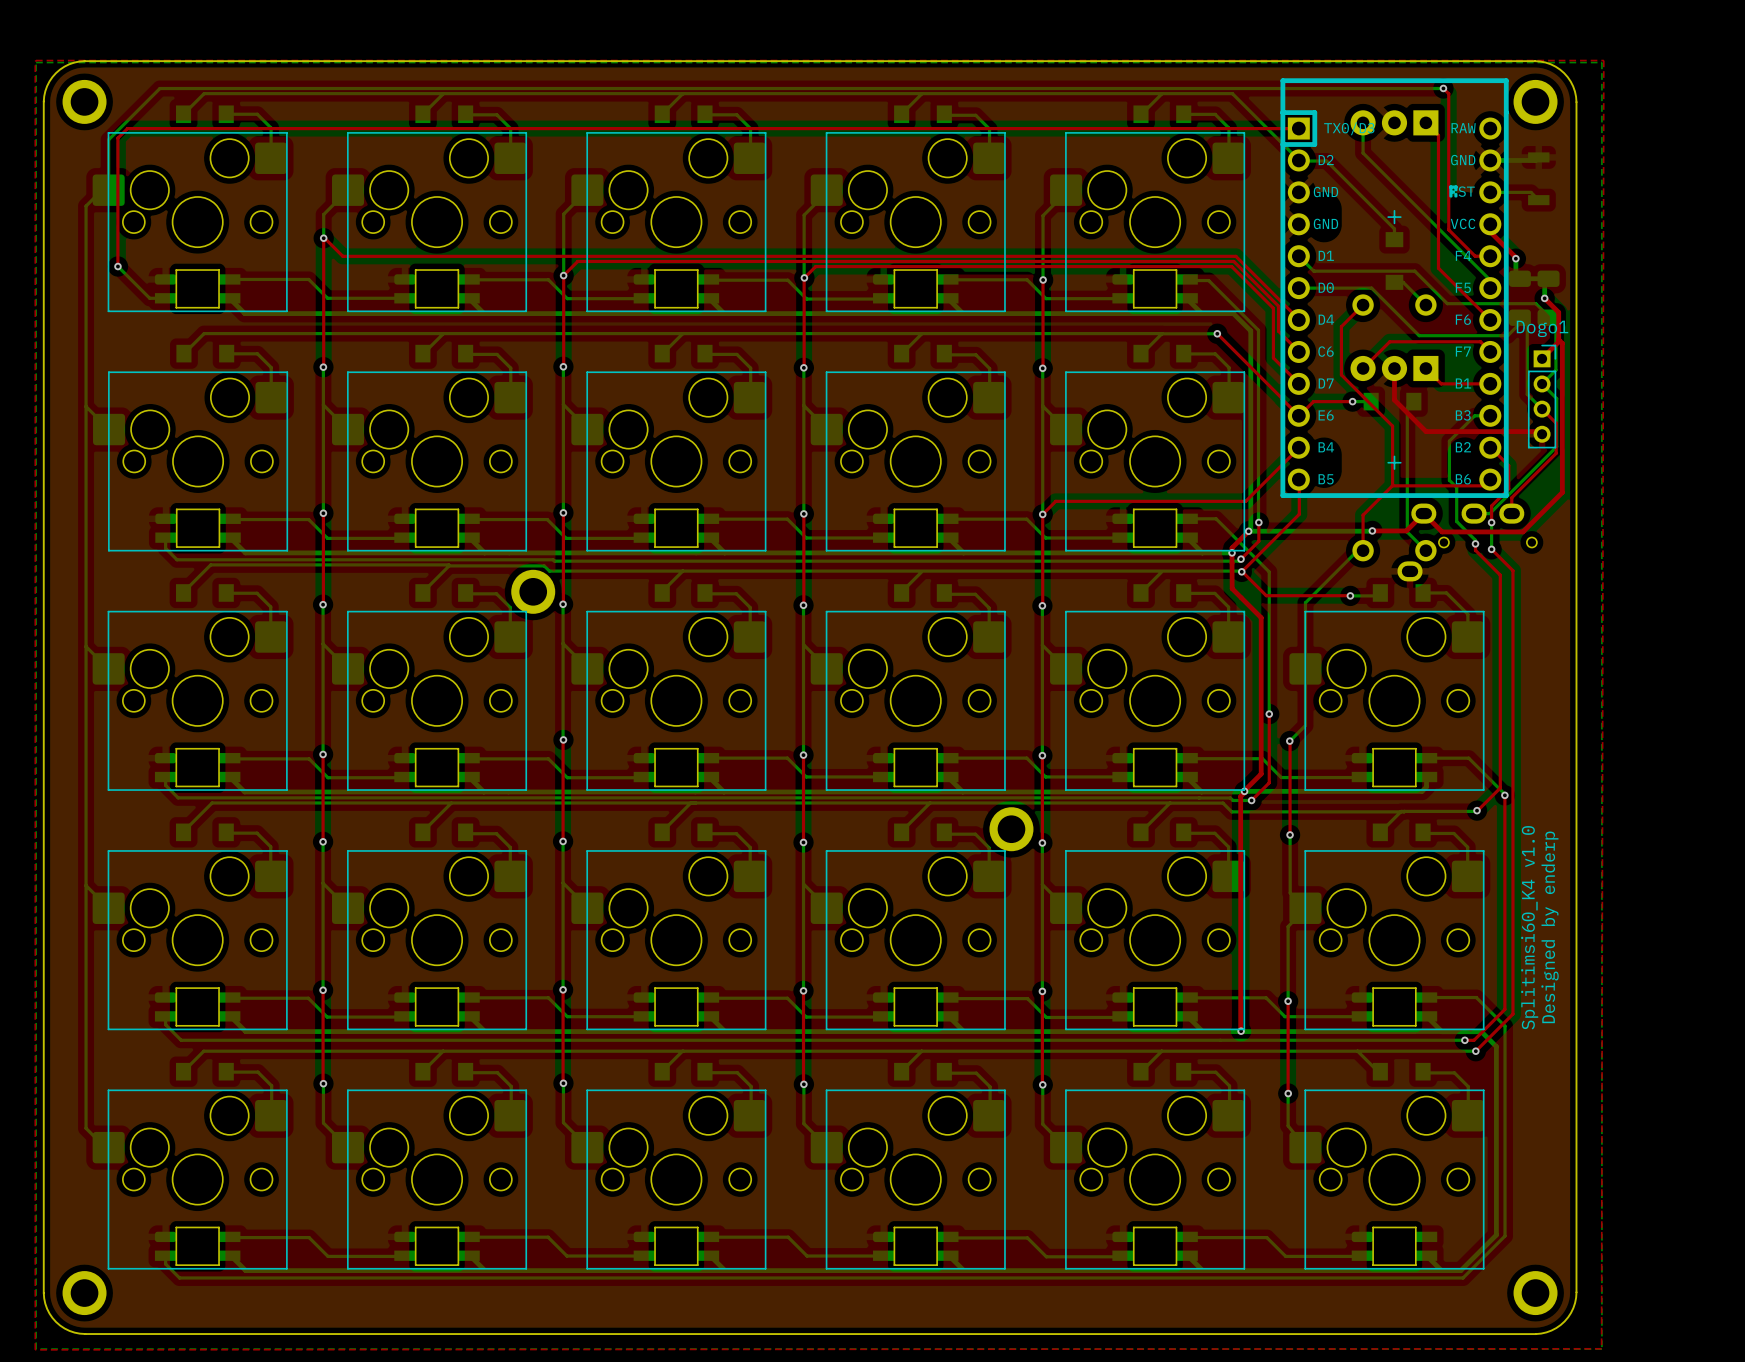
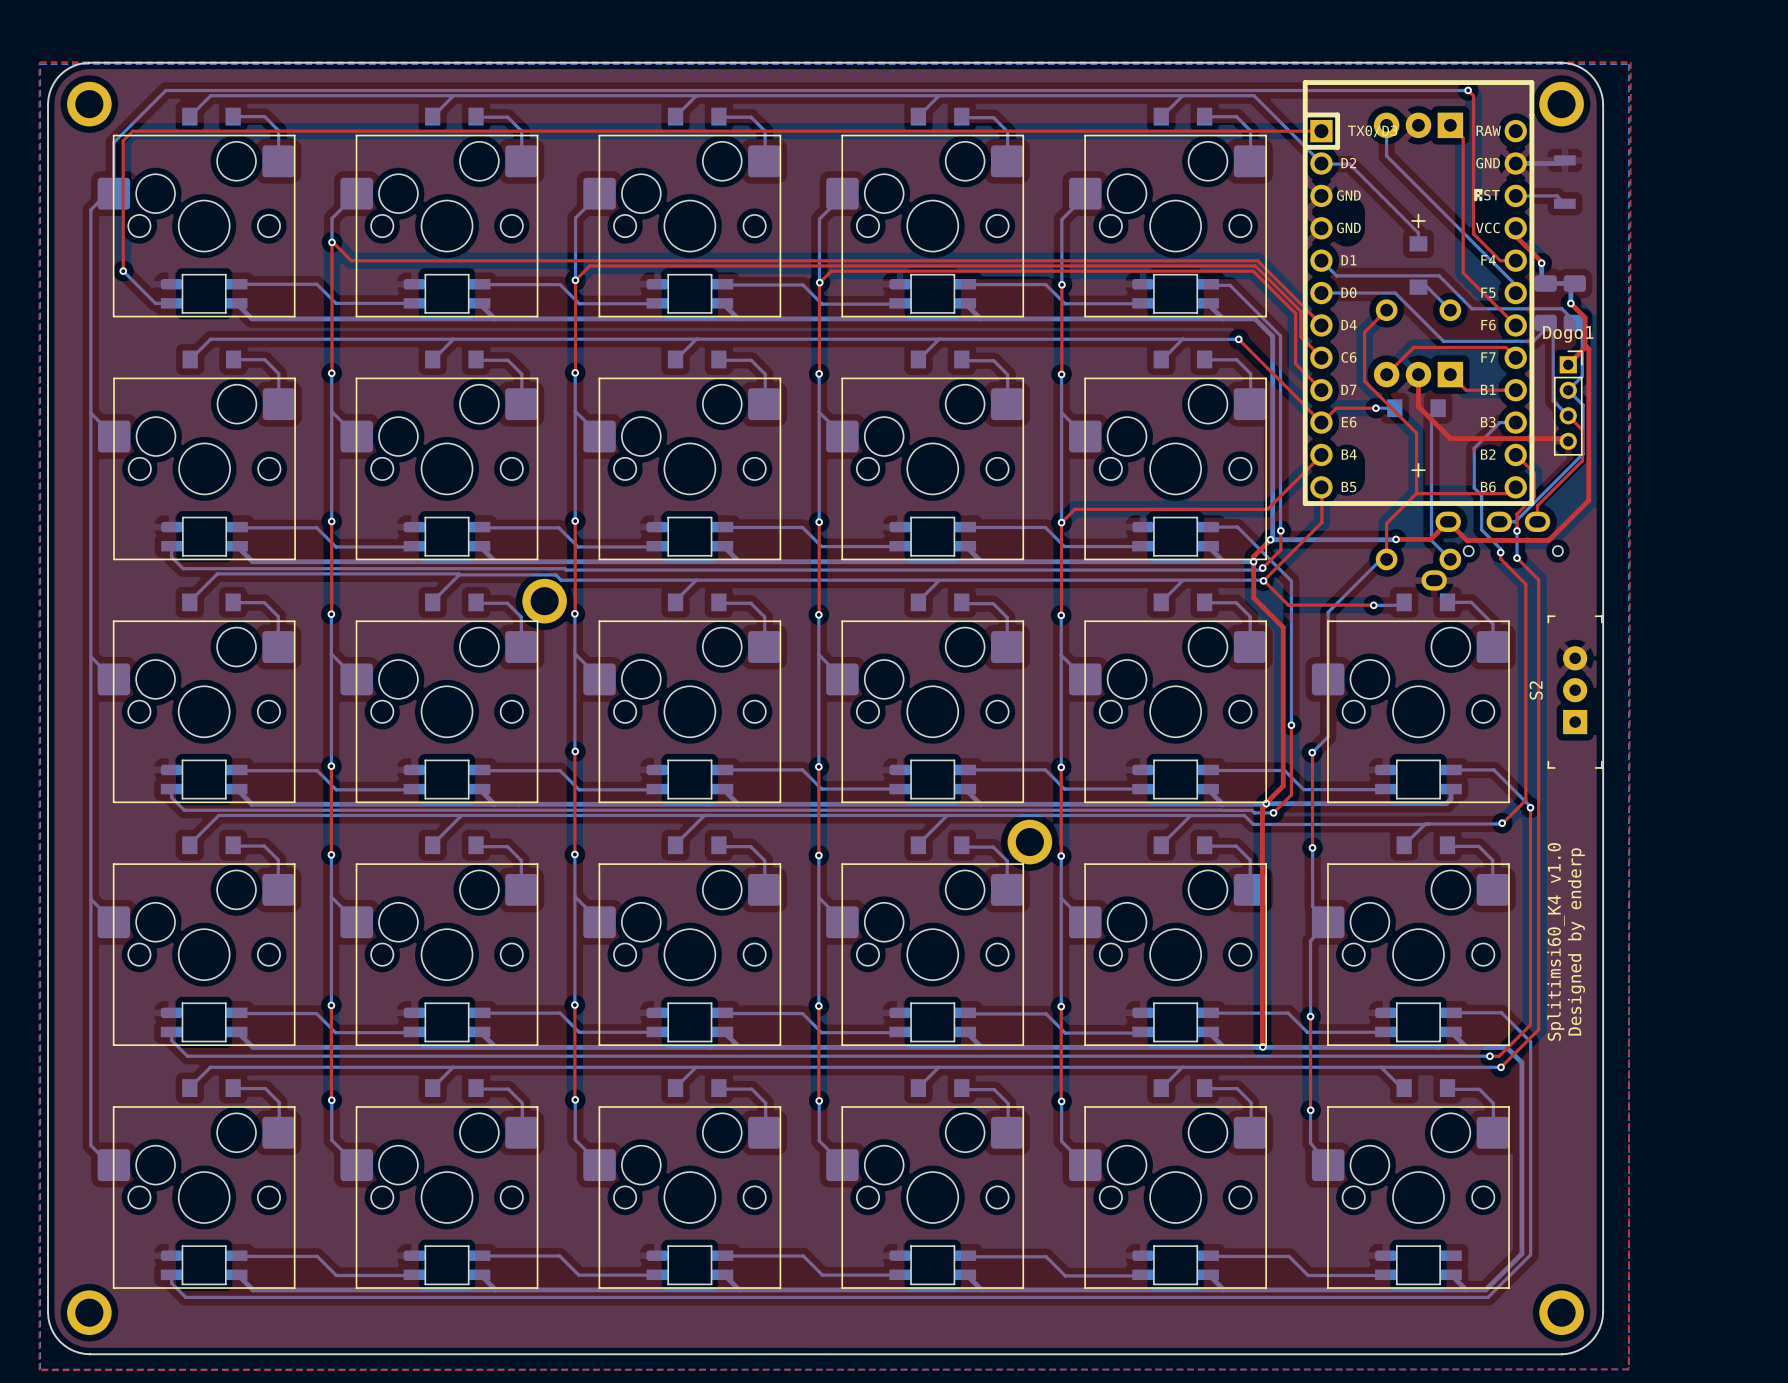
S2: none -> (1575, 692)

